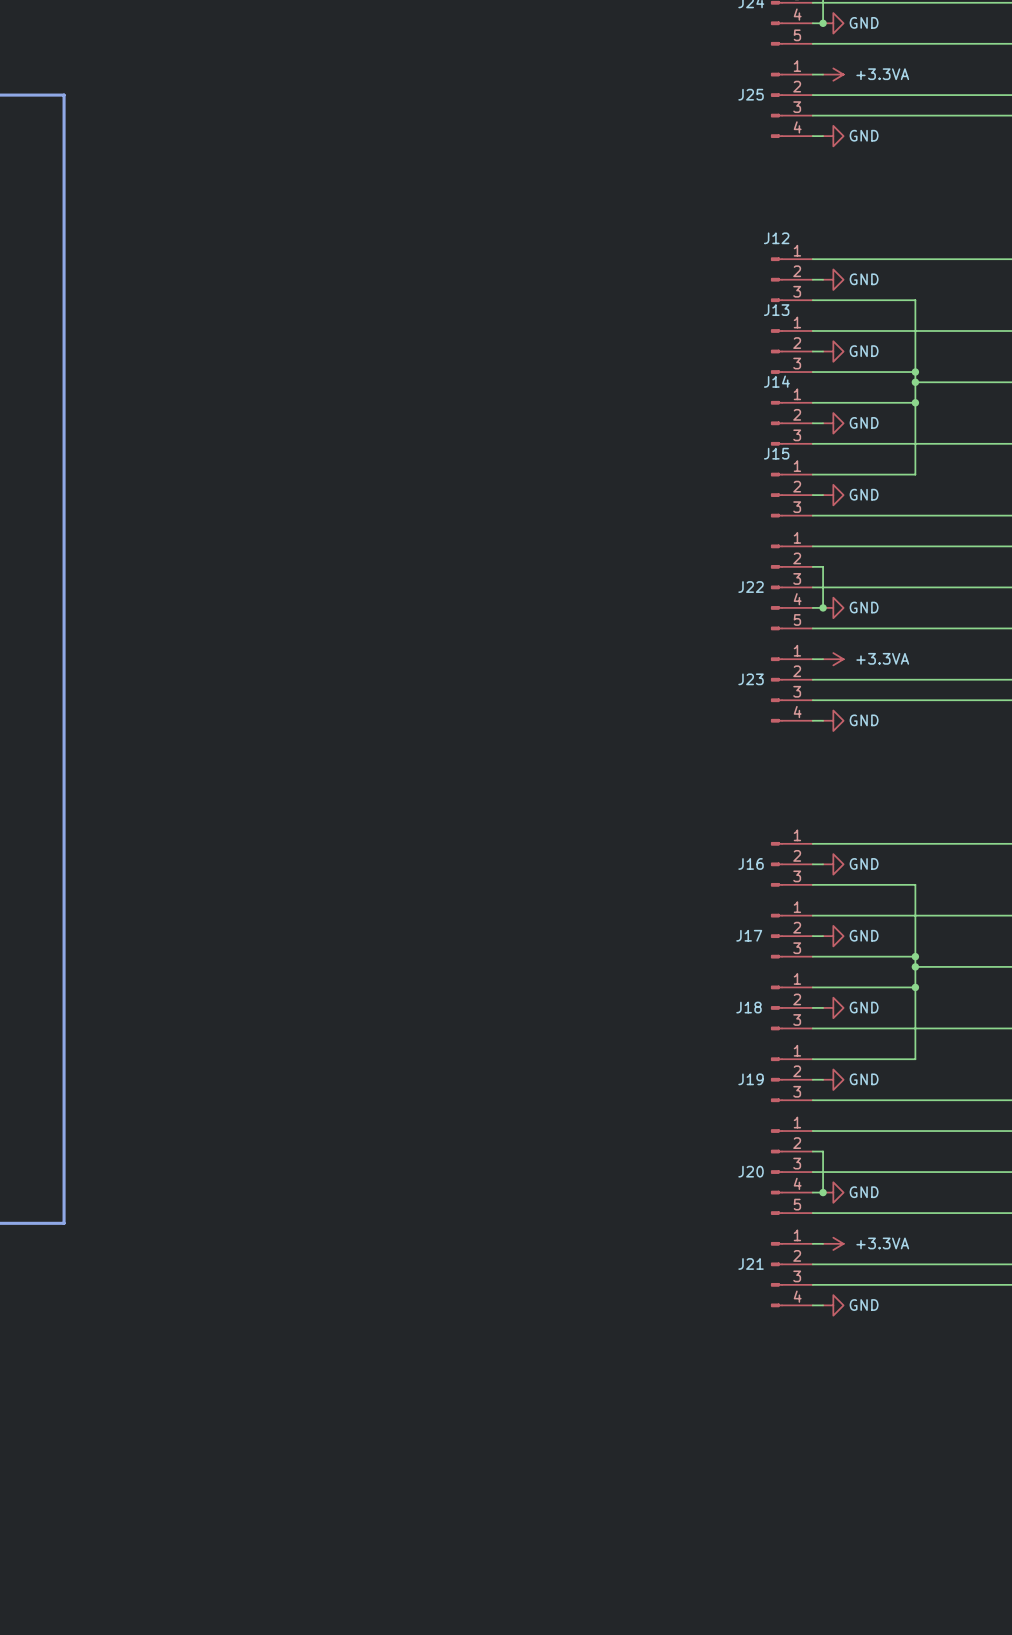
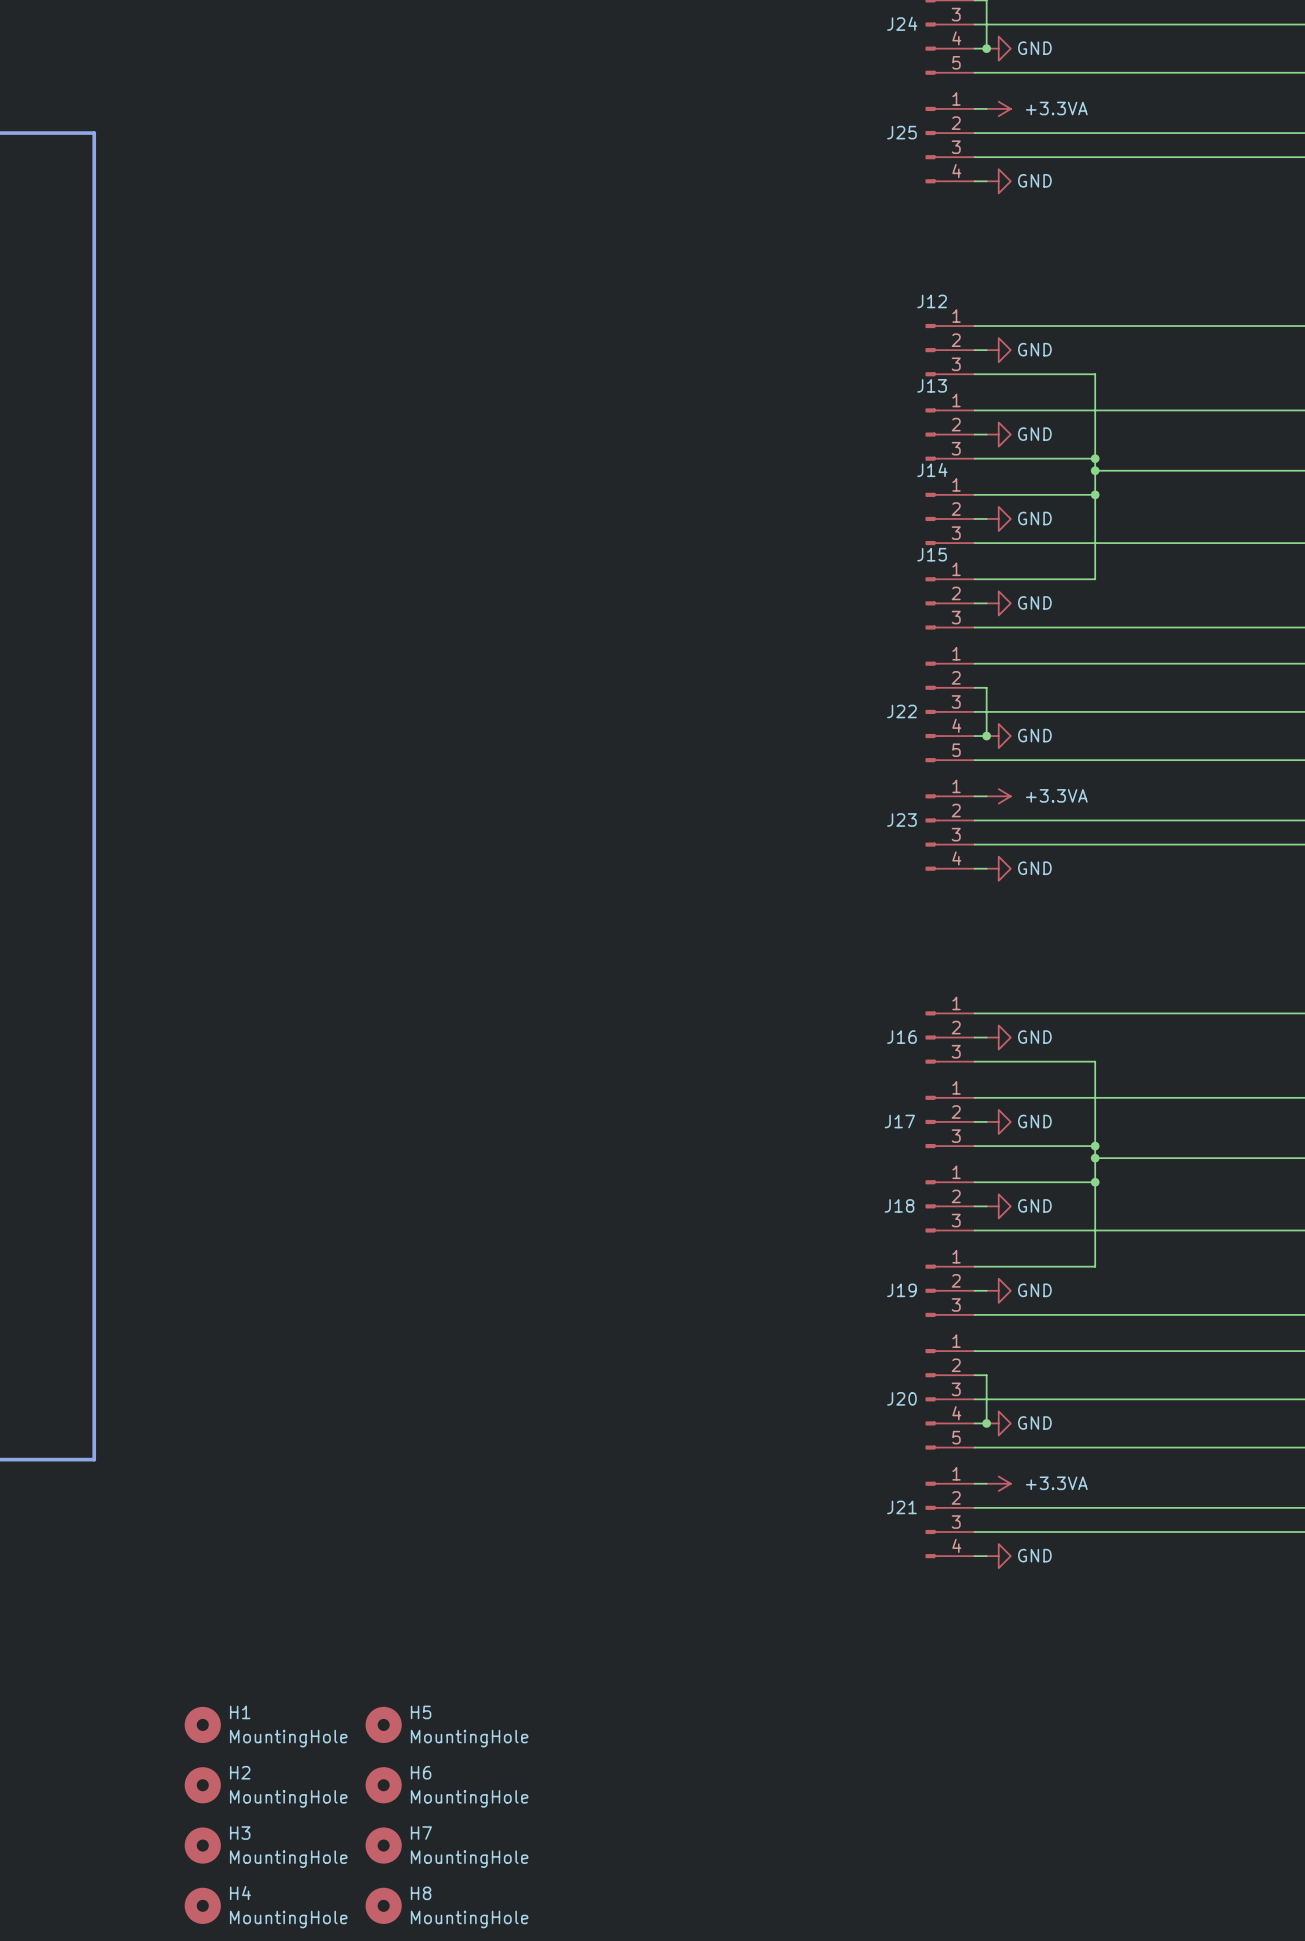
H1: none -> MountingHole (202, 1724)
H5: none -> MountingHole (383, 1724)
H2: none -> MountingHole (202, 1785)
H6: none -> MountingHole (383, 1785)
H3: none -> MountingHole (202, 1845)
H7: none -> MountingHole (383, 1845)
H4: none -> MountingHole (202, 1905)
H8: none -> MountingHole (383, 1905)

